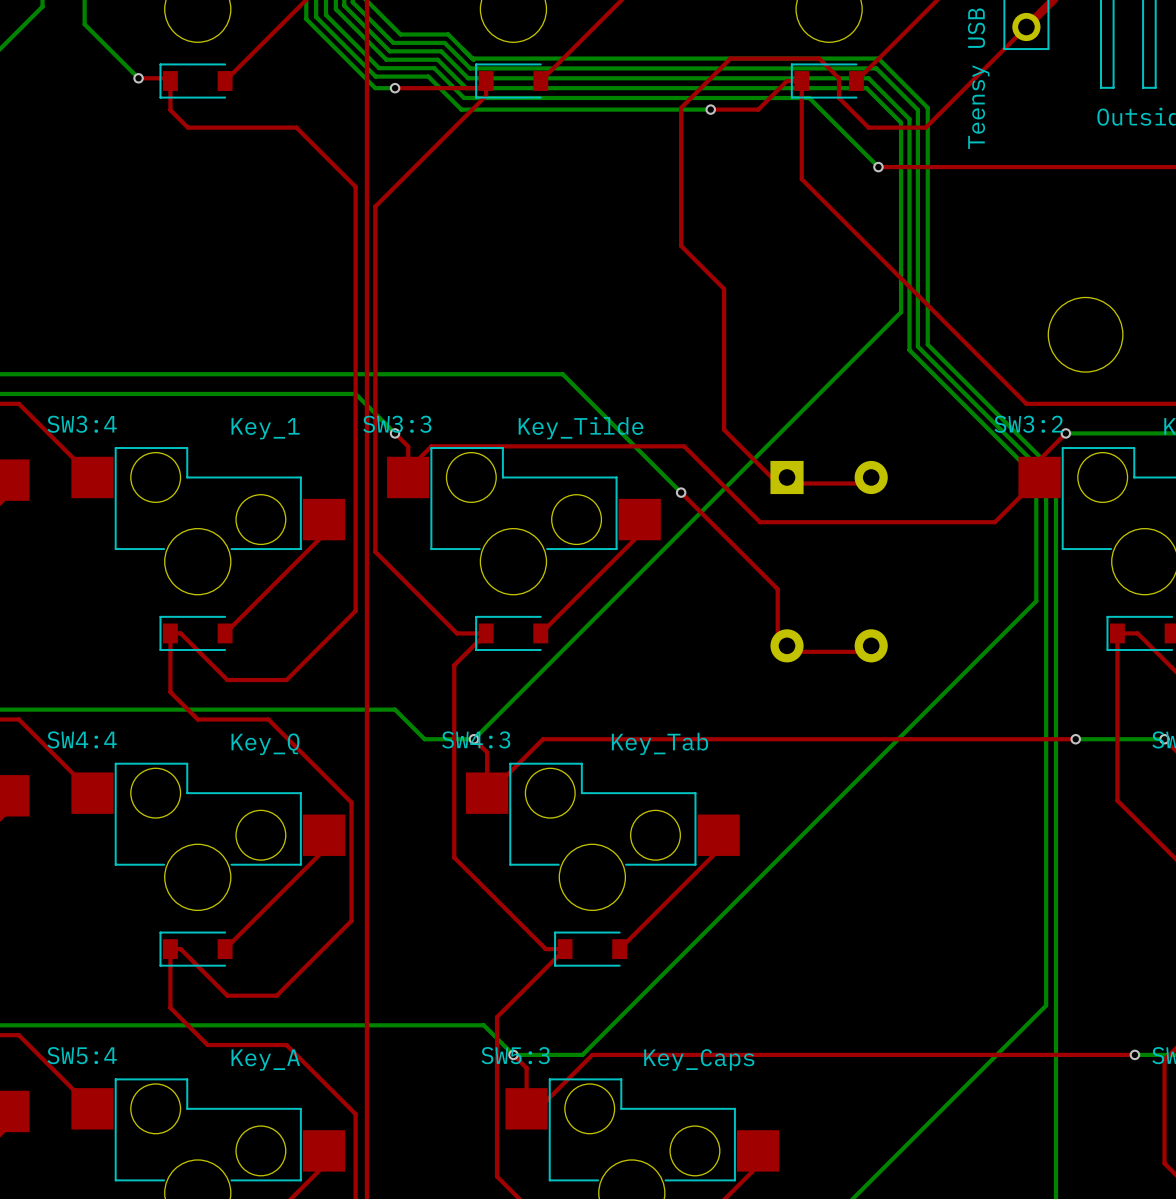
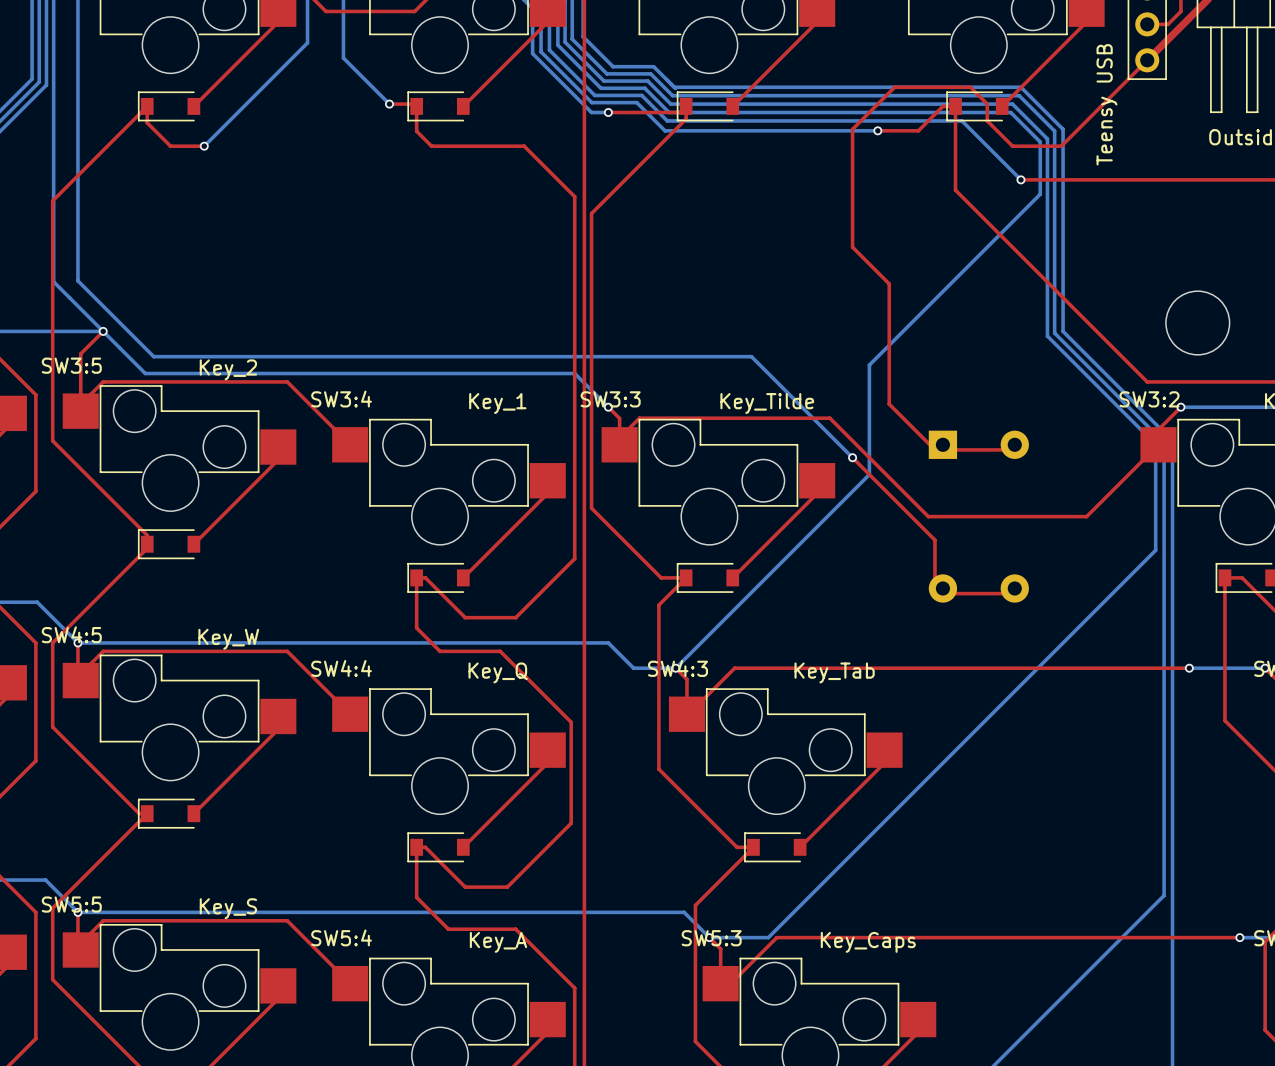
bottom track: (901, 183) (901, 312) (700, 512) -> (1040, 194) (869, 365) (869, 474)
top track: (654, 446) (684, 446) (760, 522) (994, 522) -> (829, 418) (928, 516) (1086, 516) (1120, 482)

